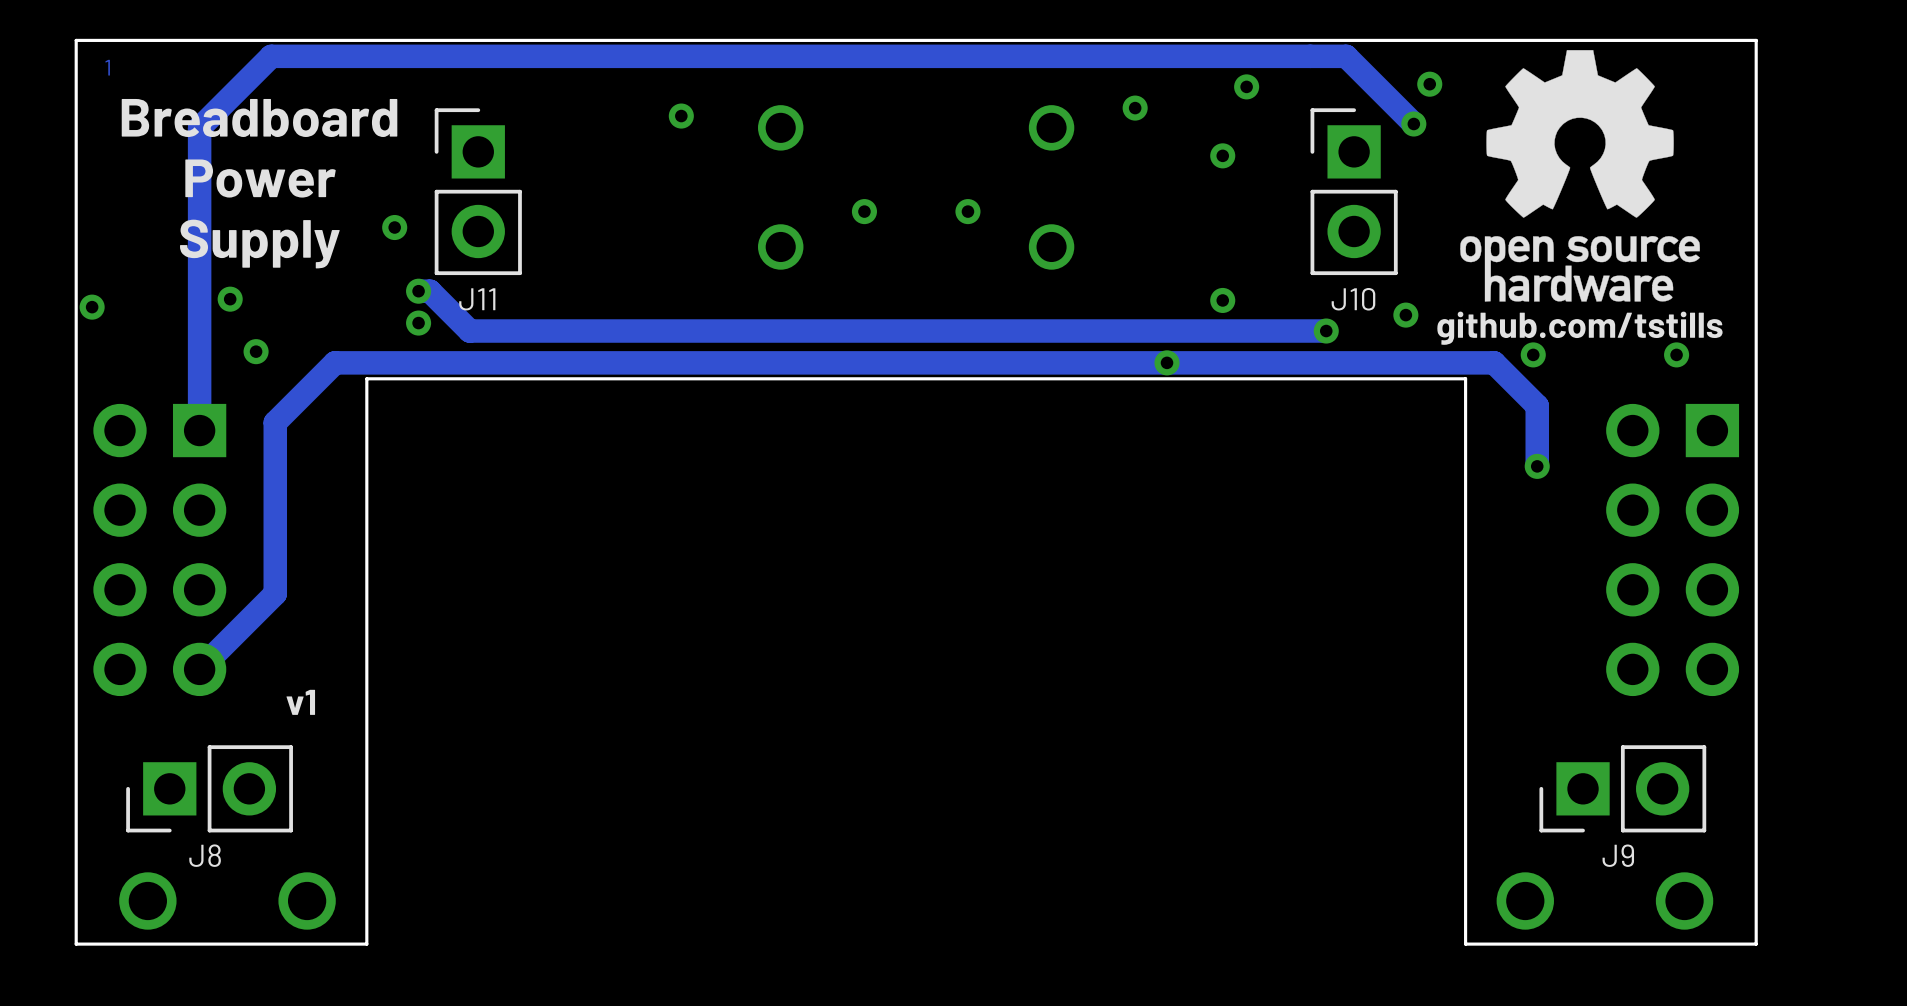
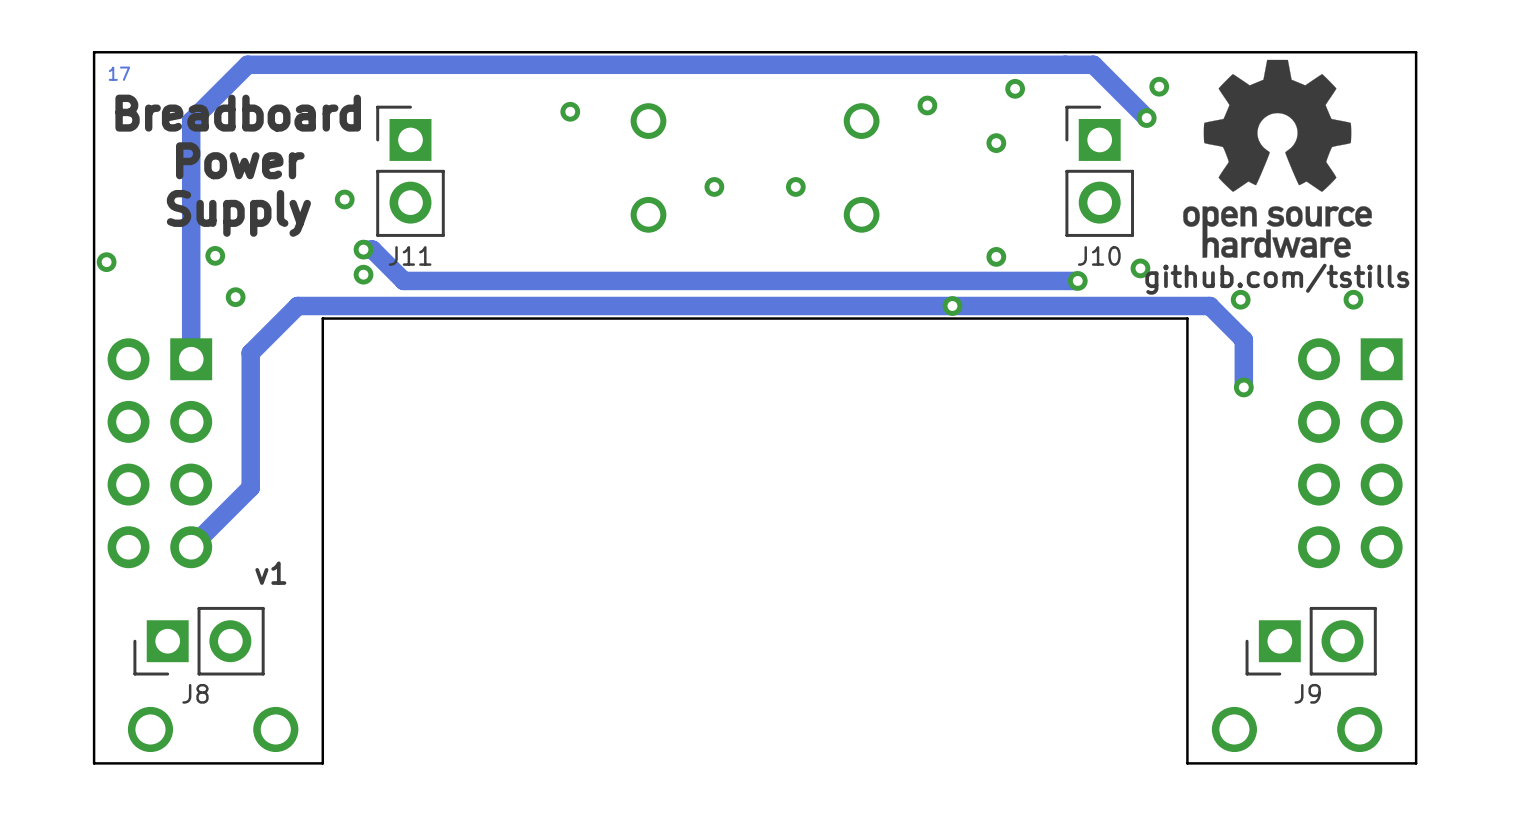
text: 1 (107, 67) -> 17 (119, 73)

